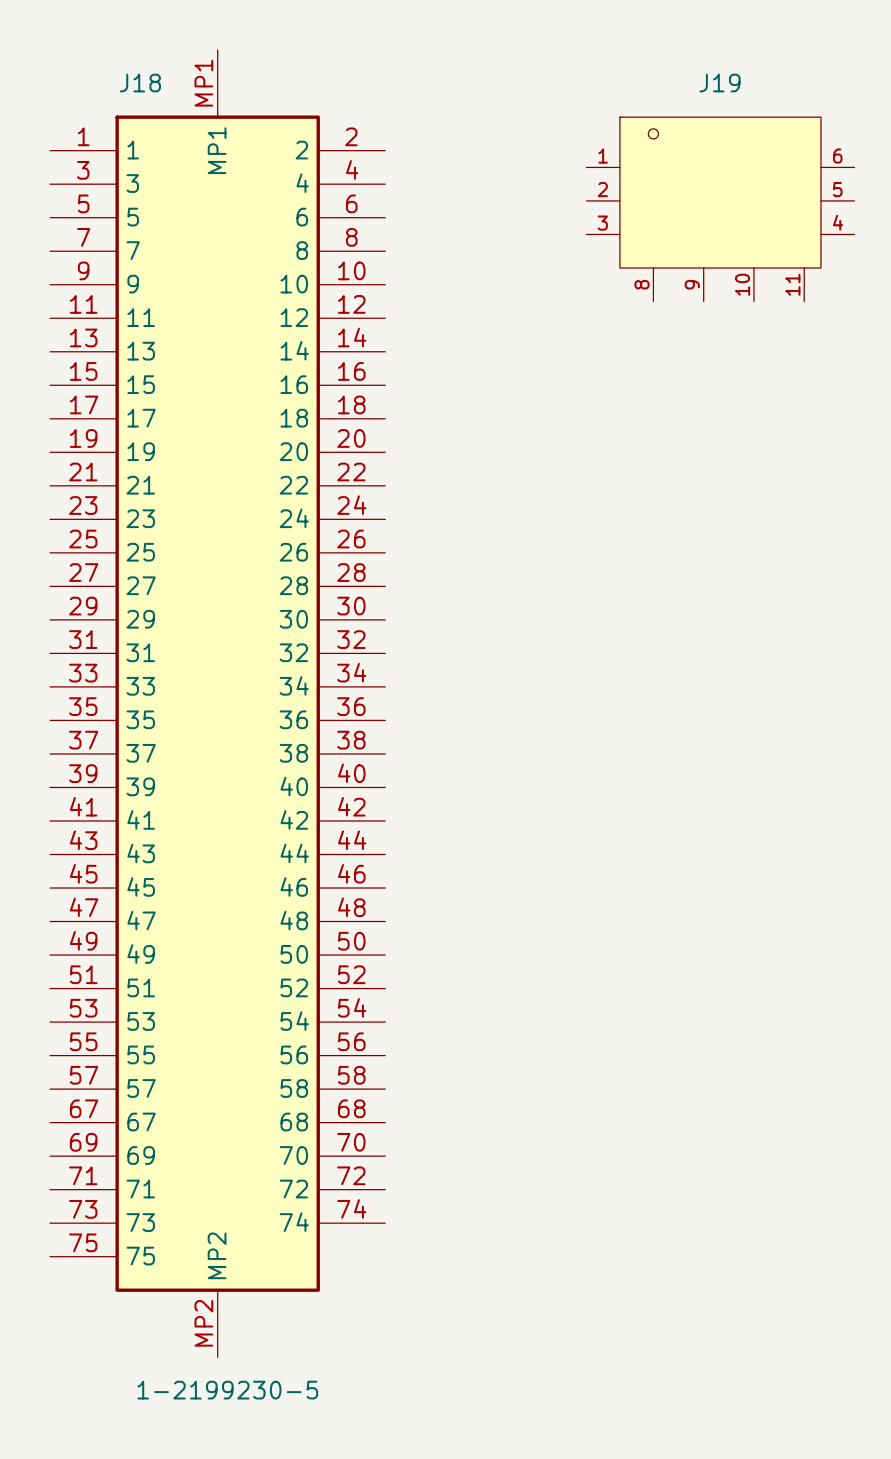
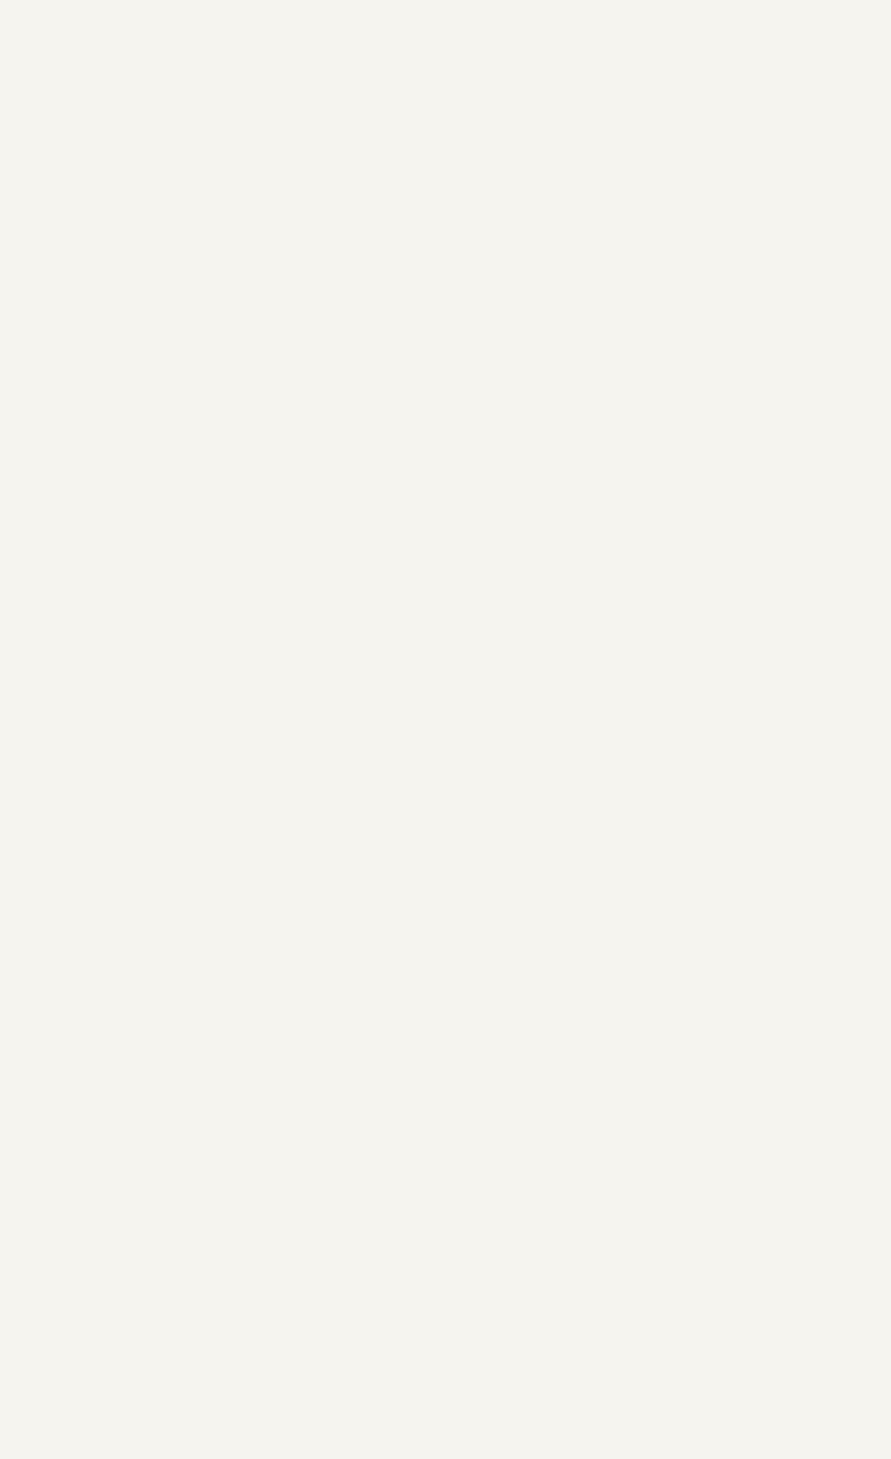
J19: (720, 209) -> none
J18: 1-2199230-5 (217, 703) -> none

